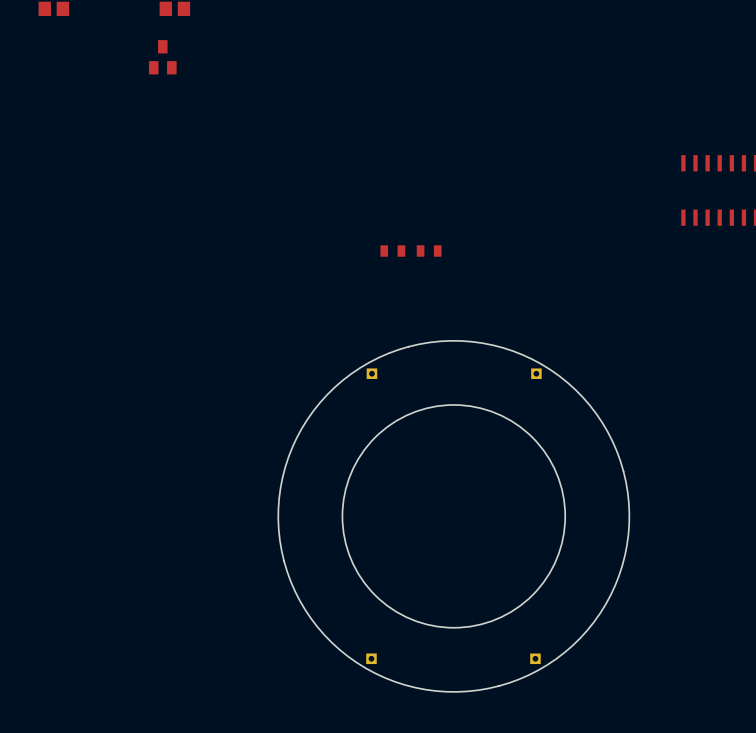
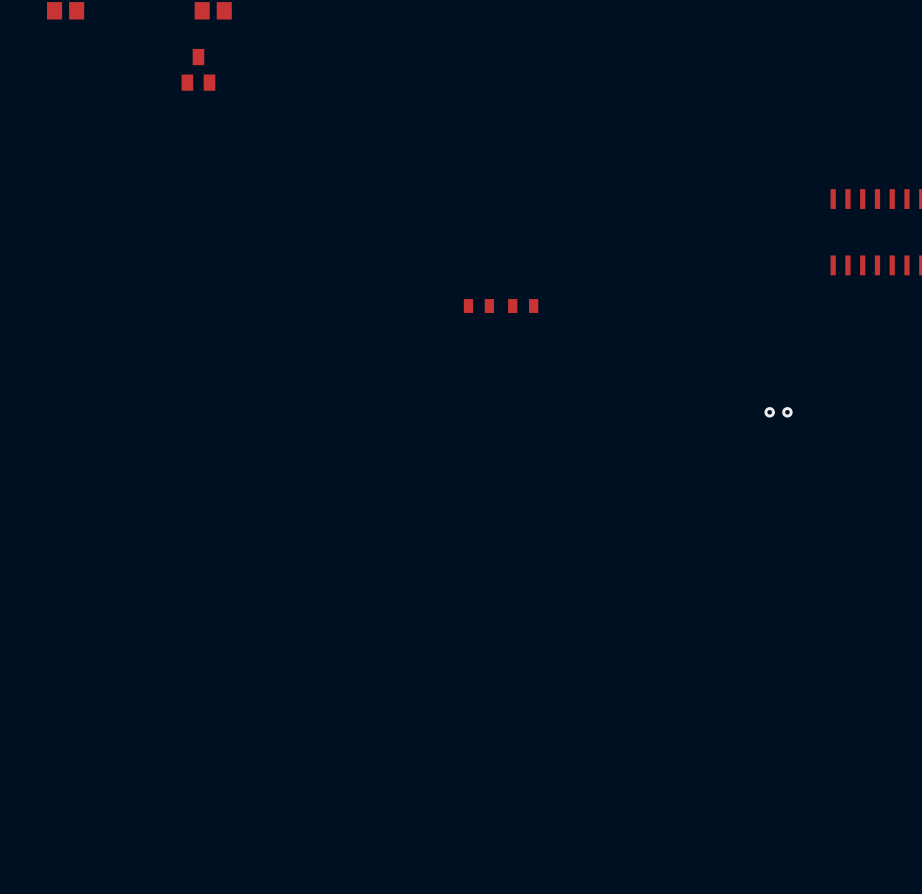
via: none -> (769, 412)
via: none -> (787, 412)
part: (453, 516) -> none

